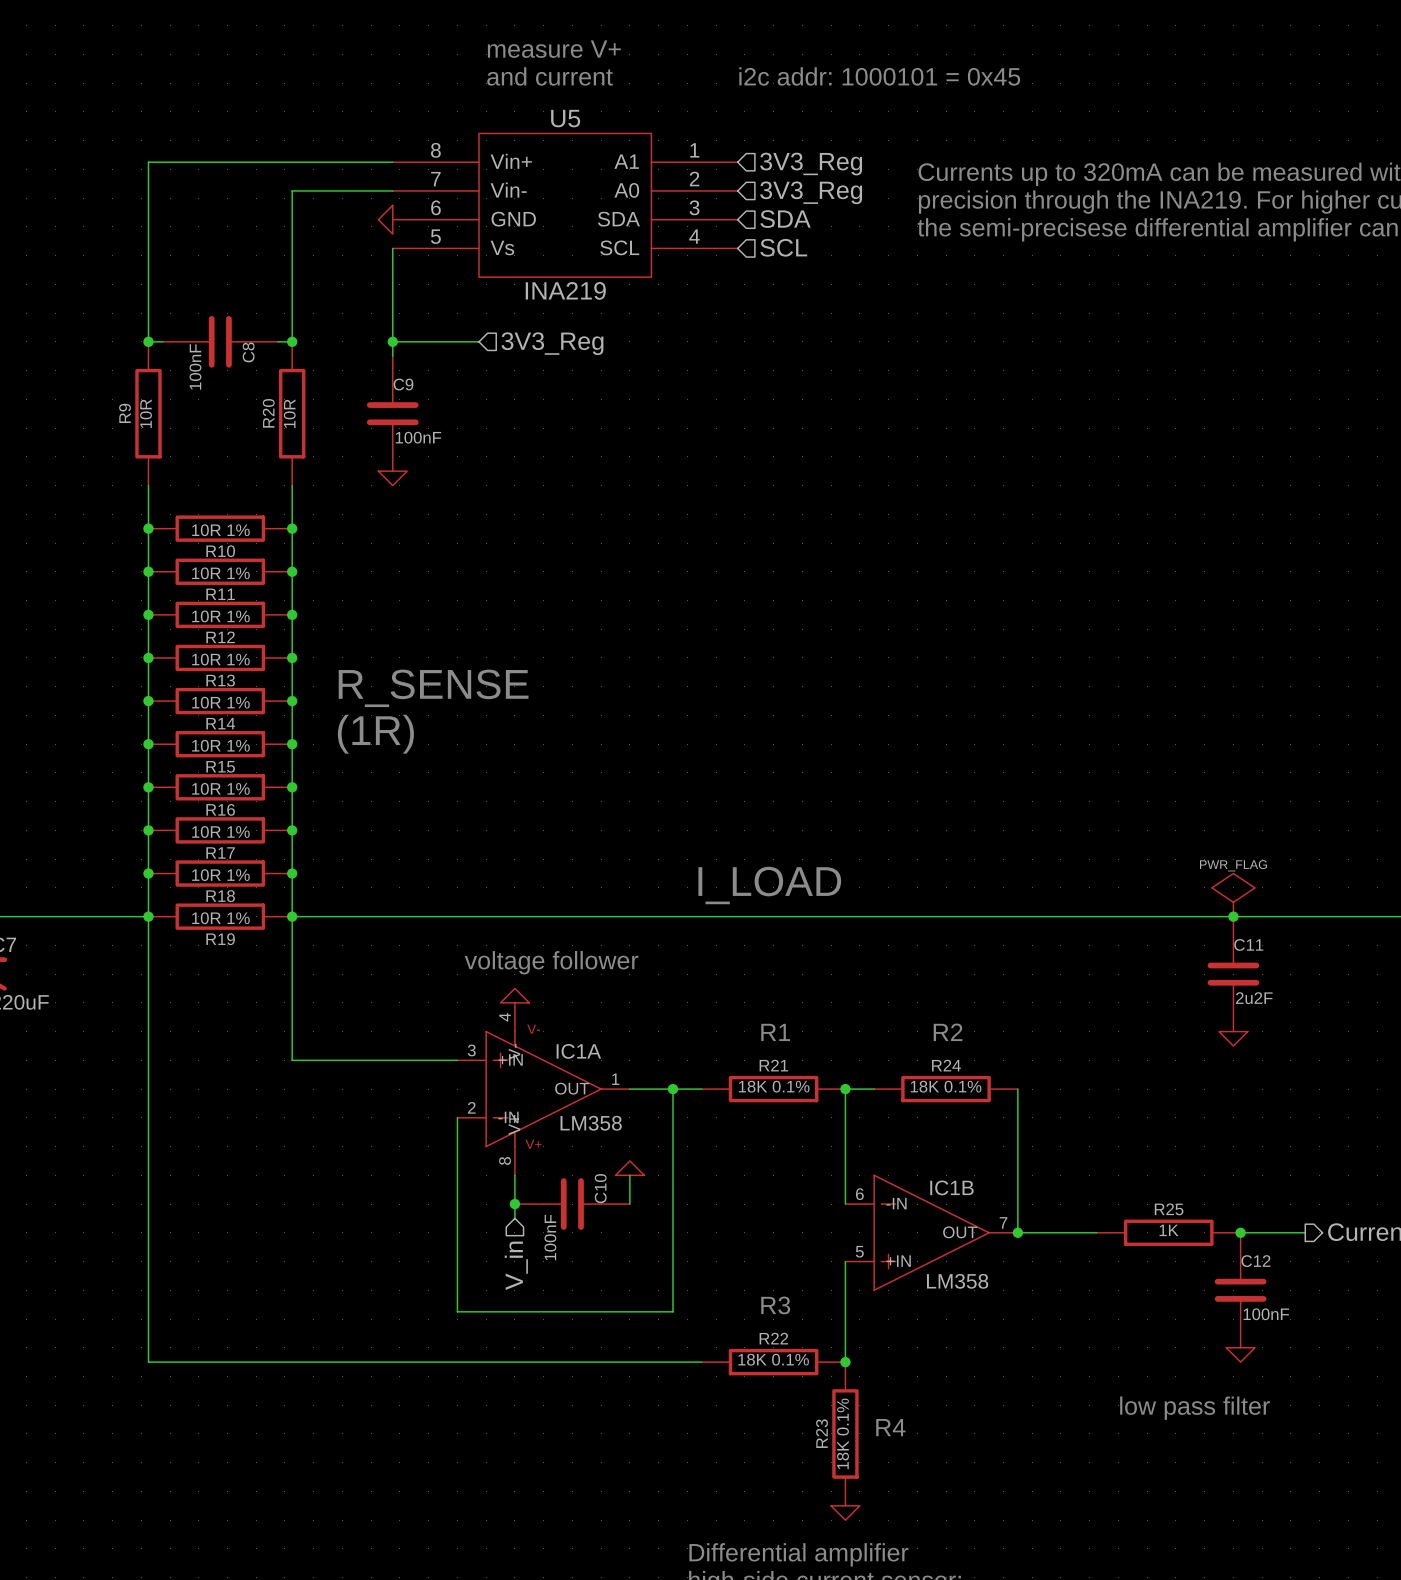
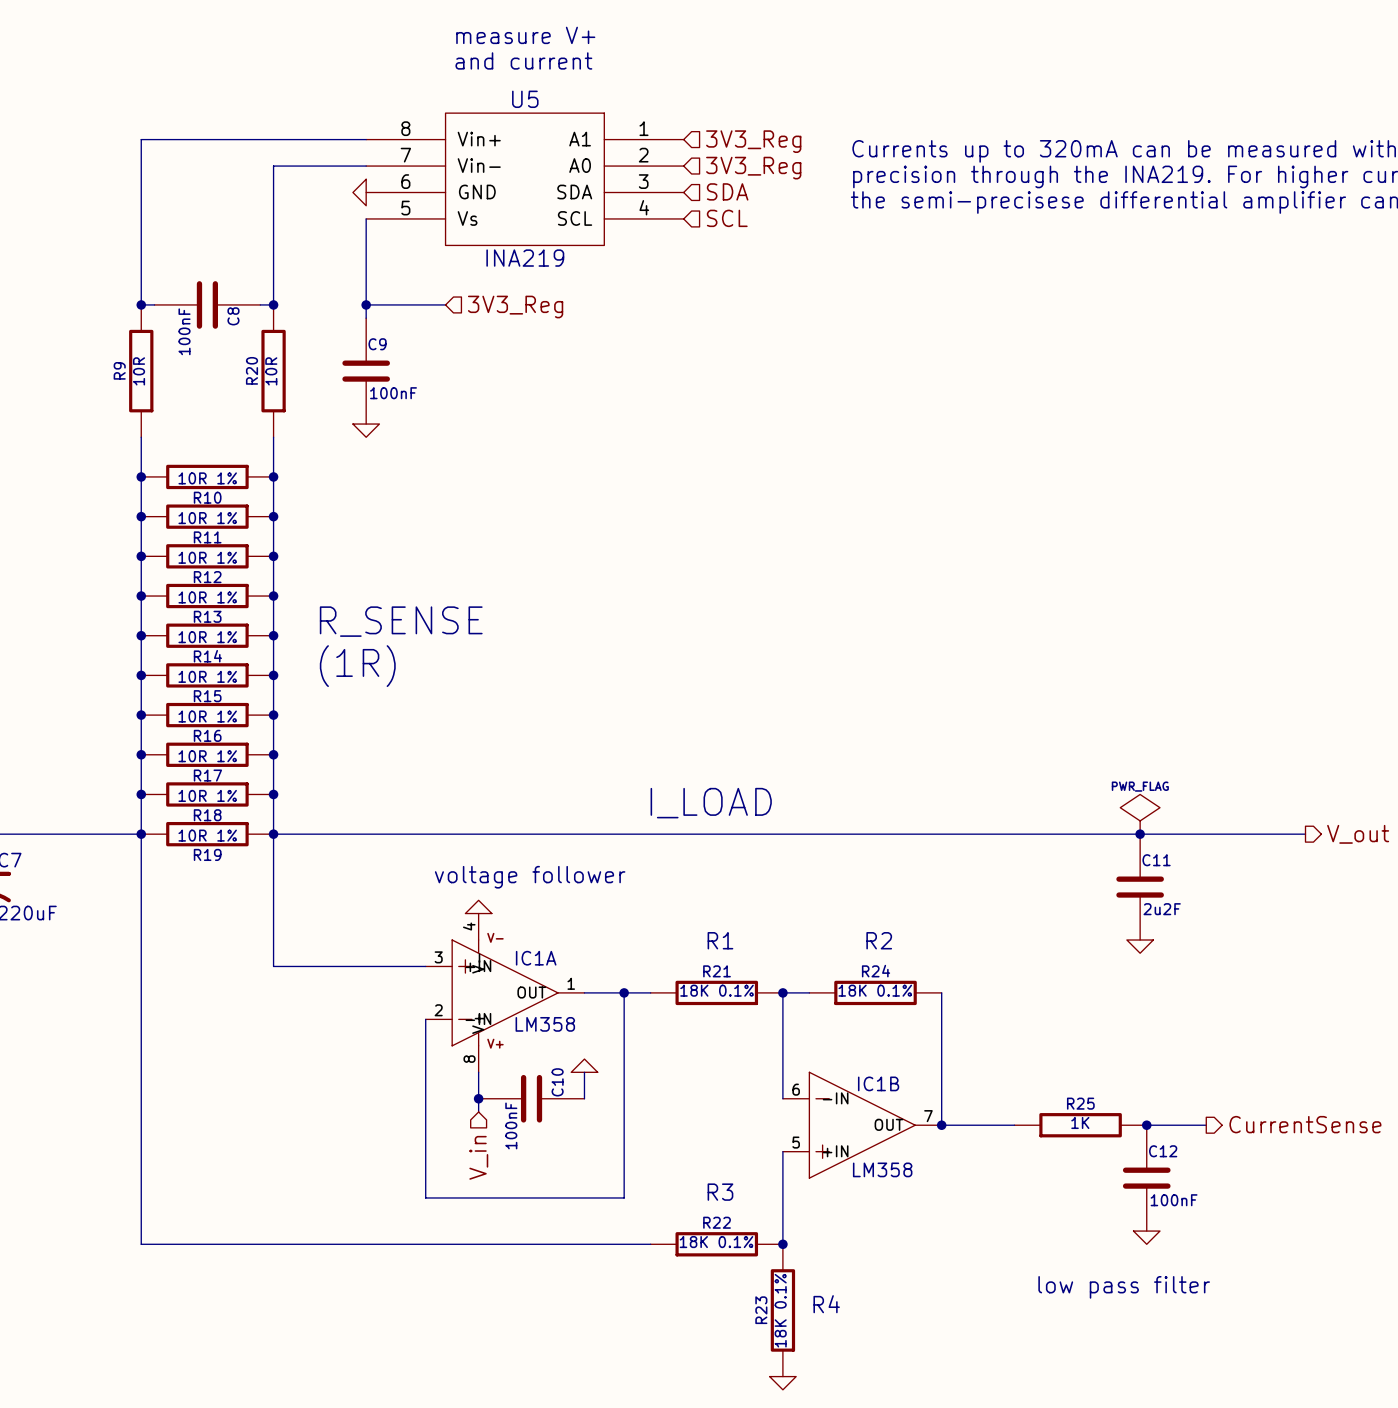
text: i2c addr: 1000101 = 0x45 (879, 76) -> none

